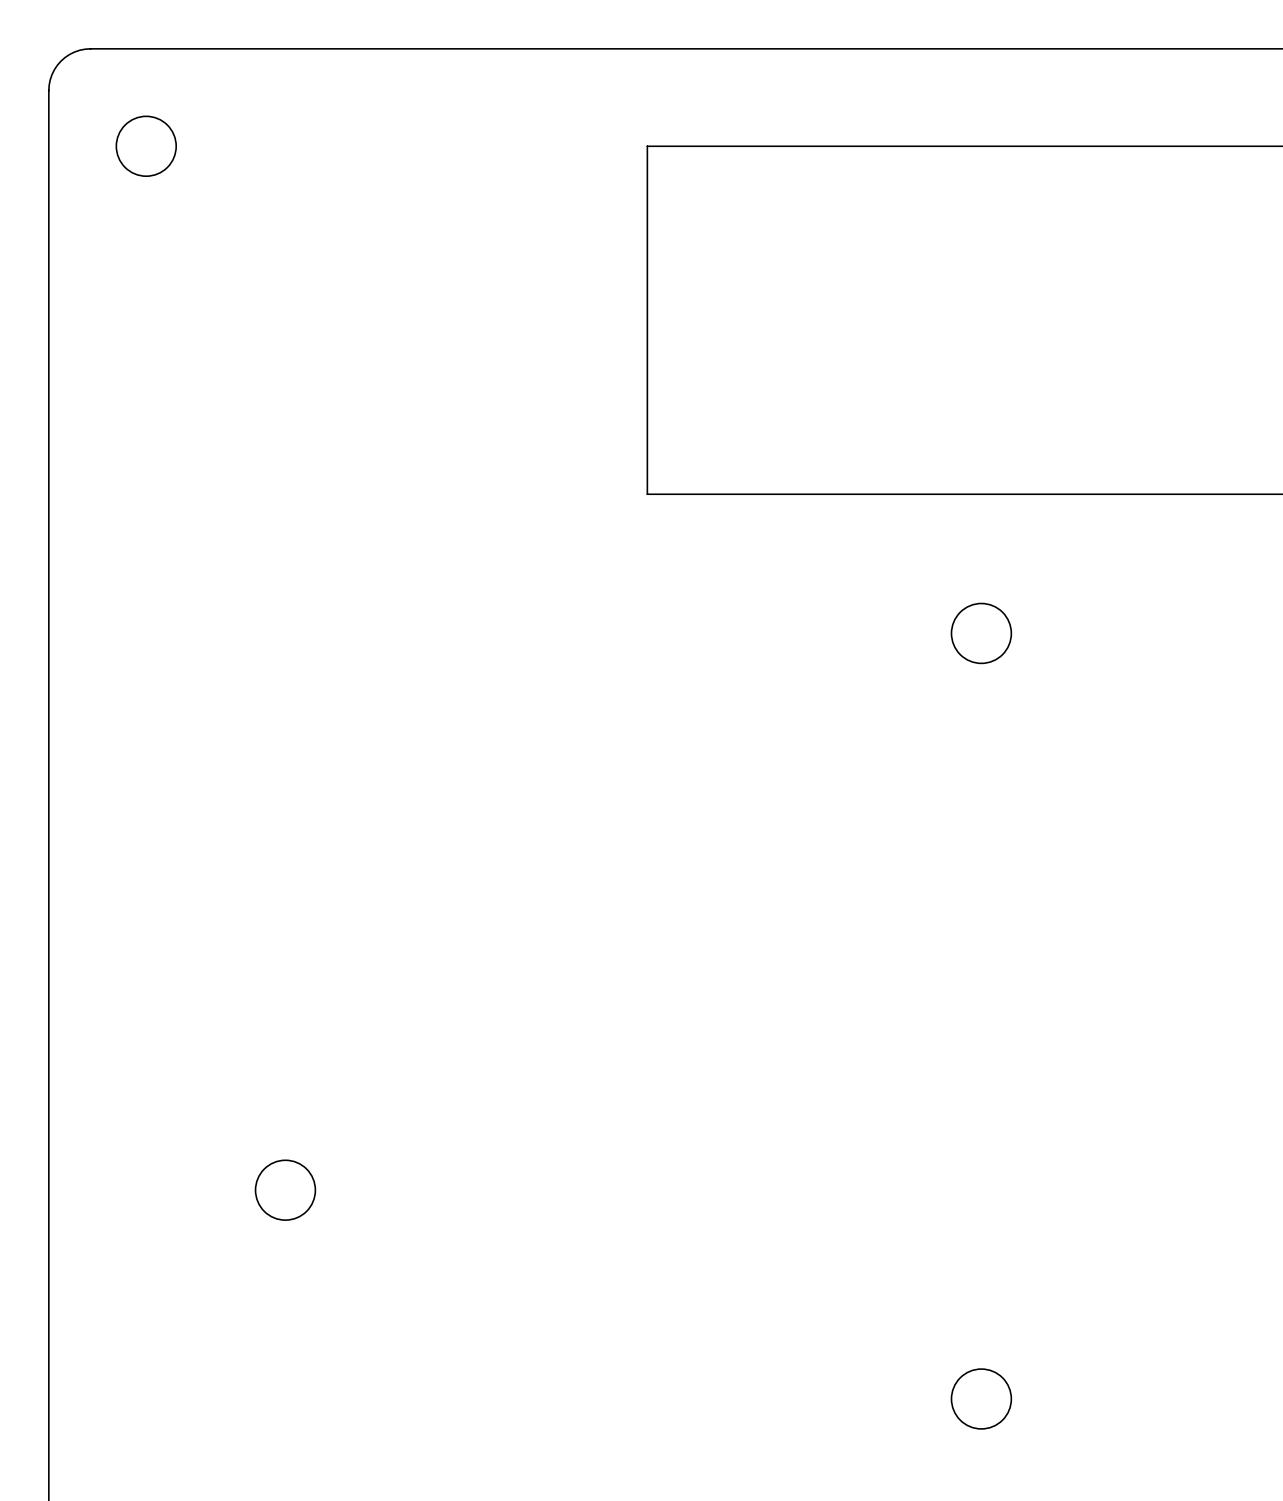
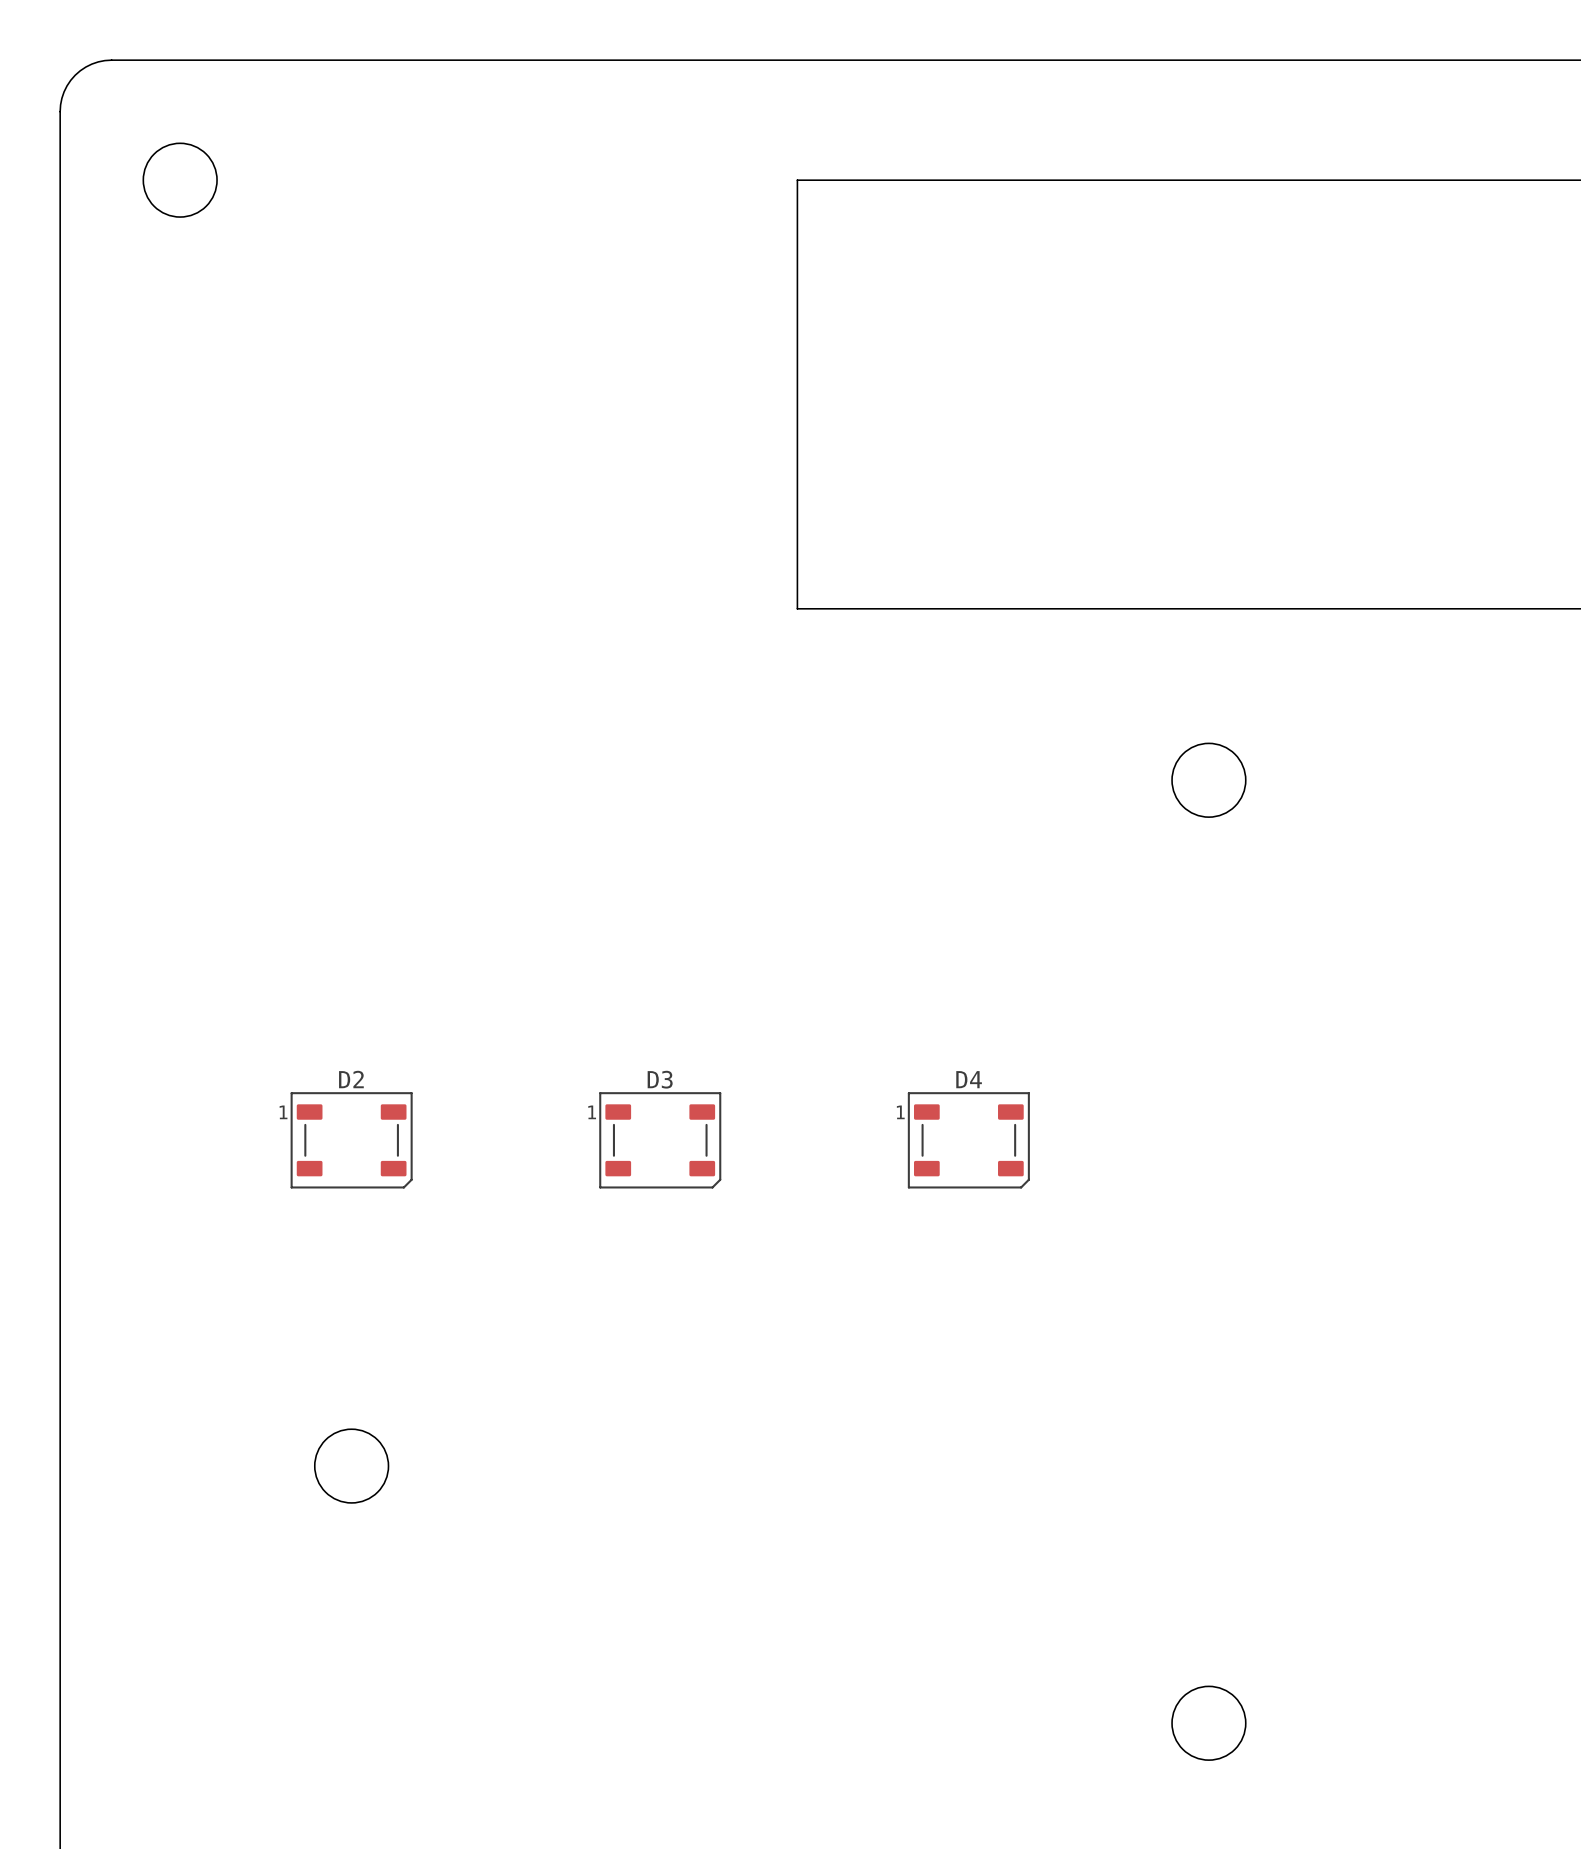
D2: none -> (351, 1140)
D3: none -> (660, 1140)
D4: none -> (968, 1140)

